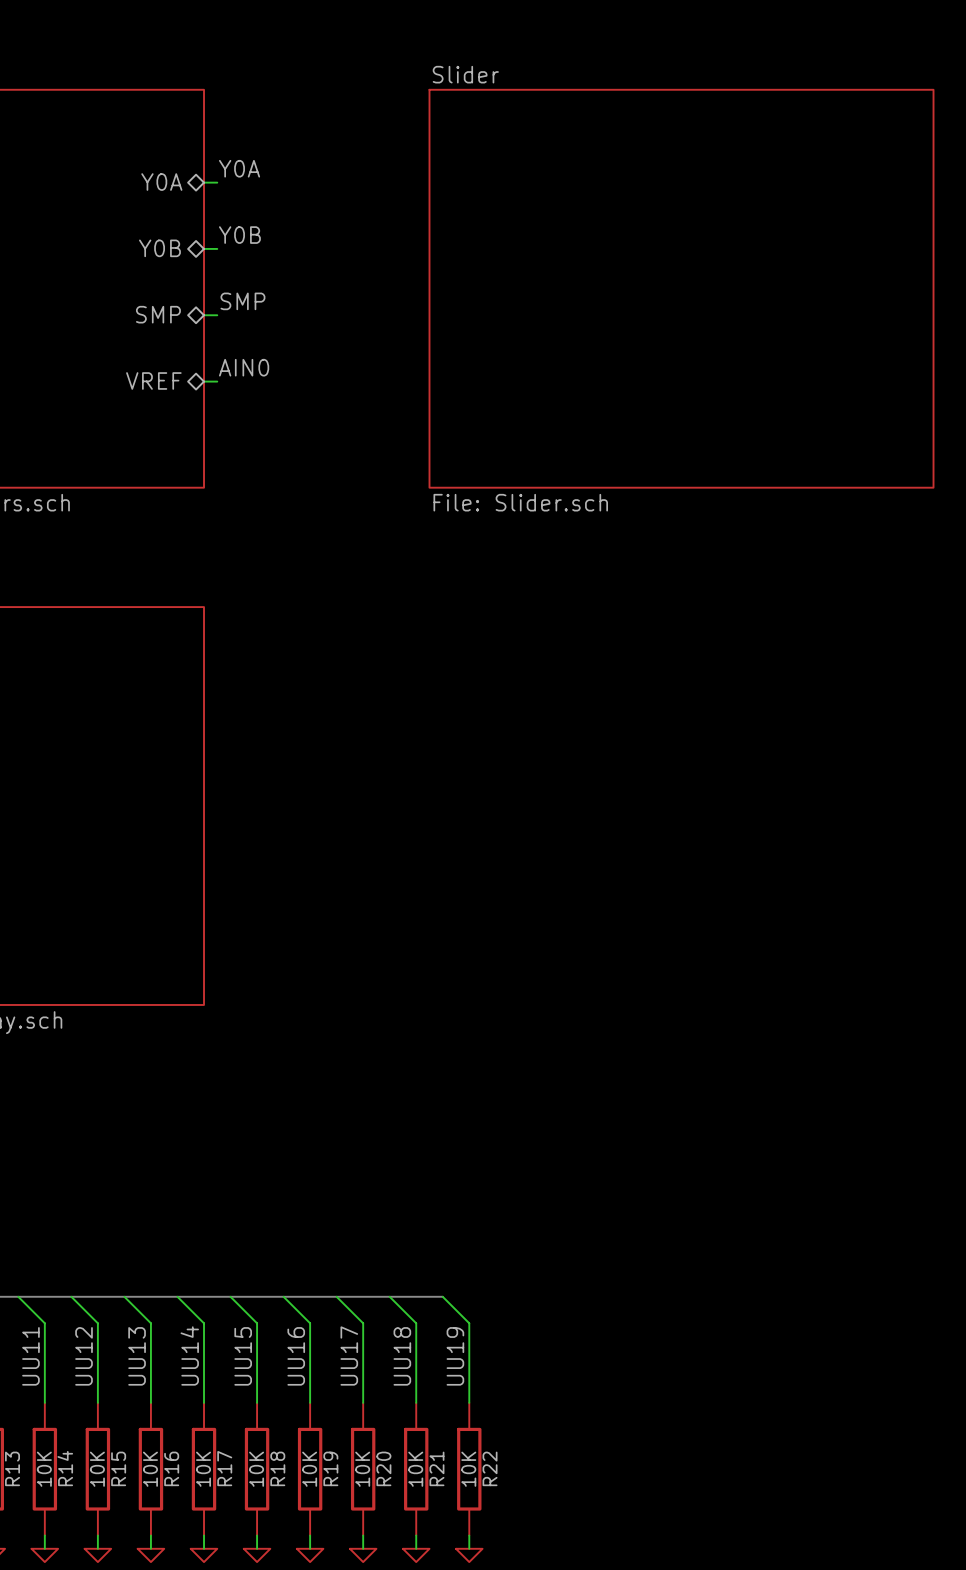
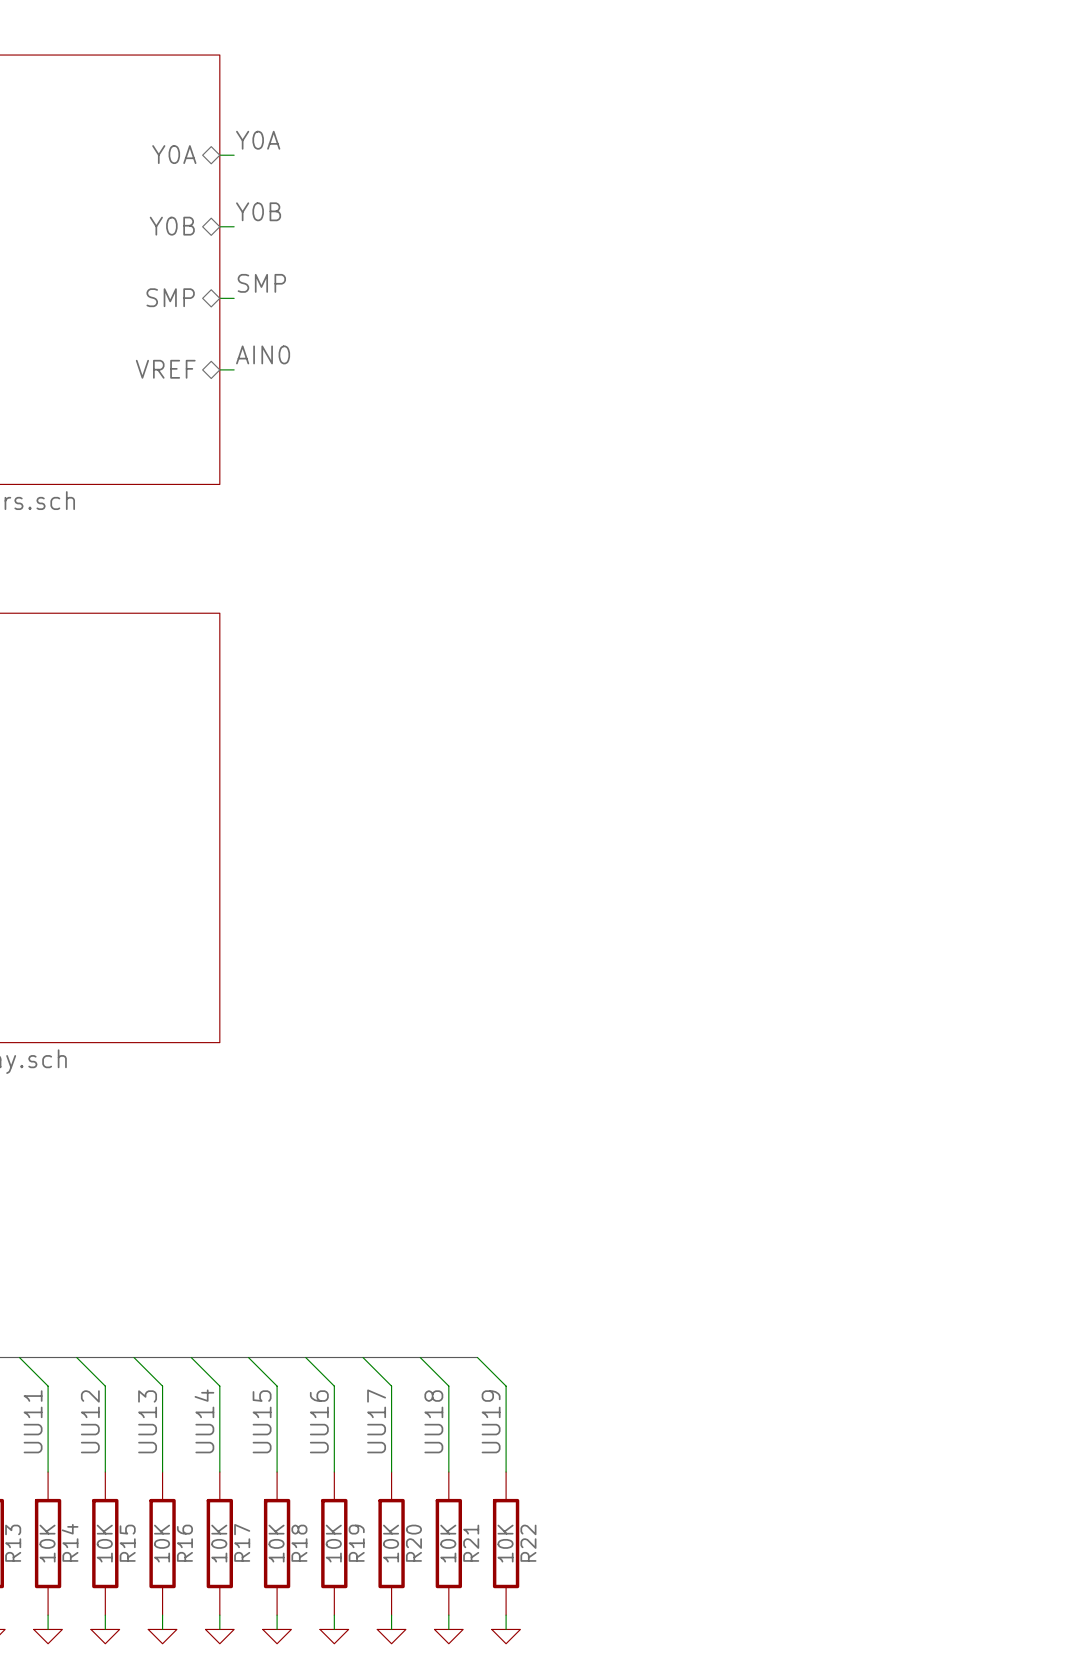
sheet Slider: File: Slider.sch (681, 288) -> none

